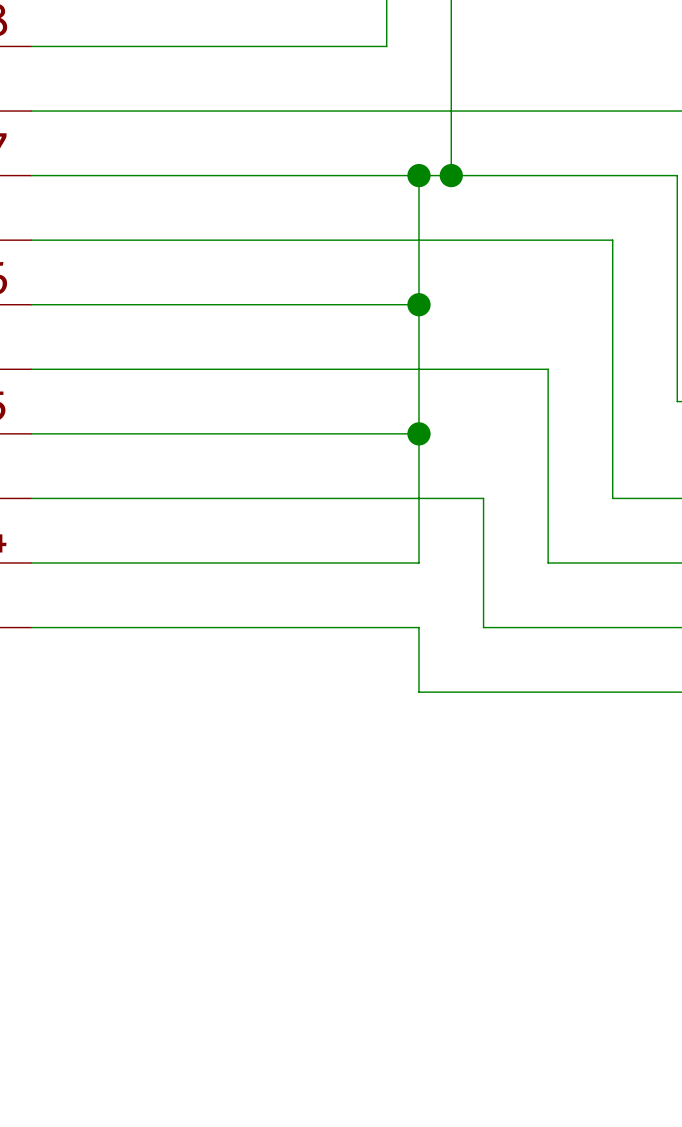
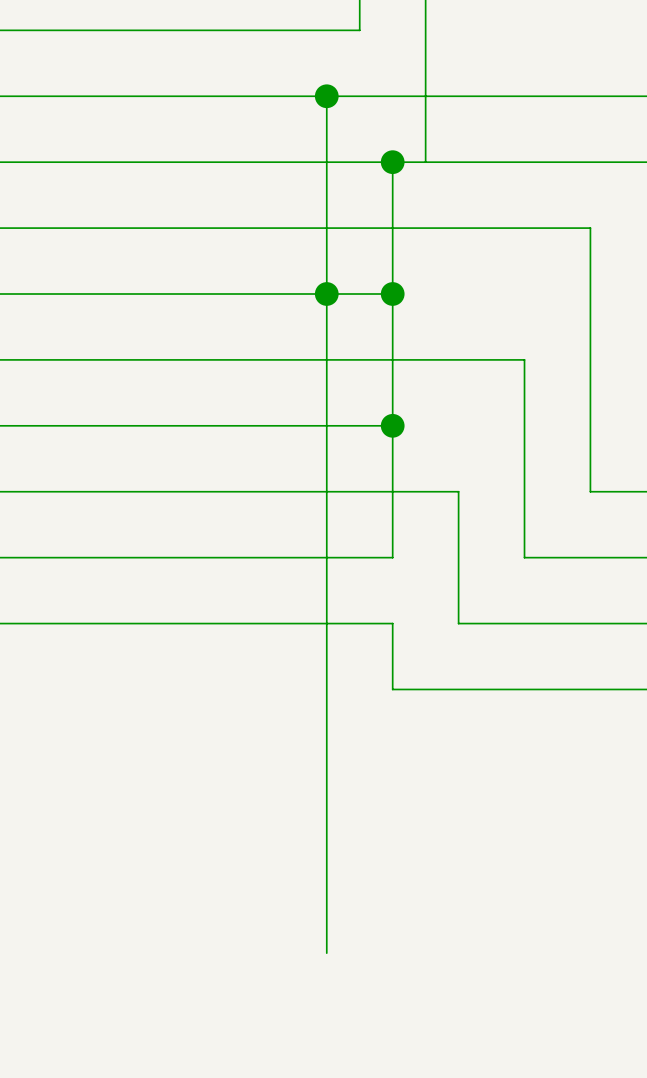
wire: none -> (326, 96) (326, 953)
junction: none -> (326, 96)
junction: (451, 175) -> none
junction: none -> (326, 293)

